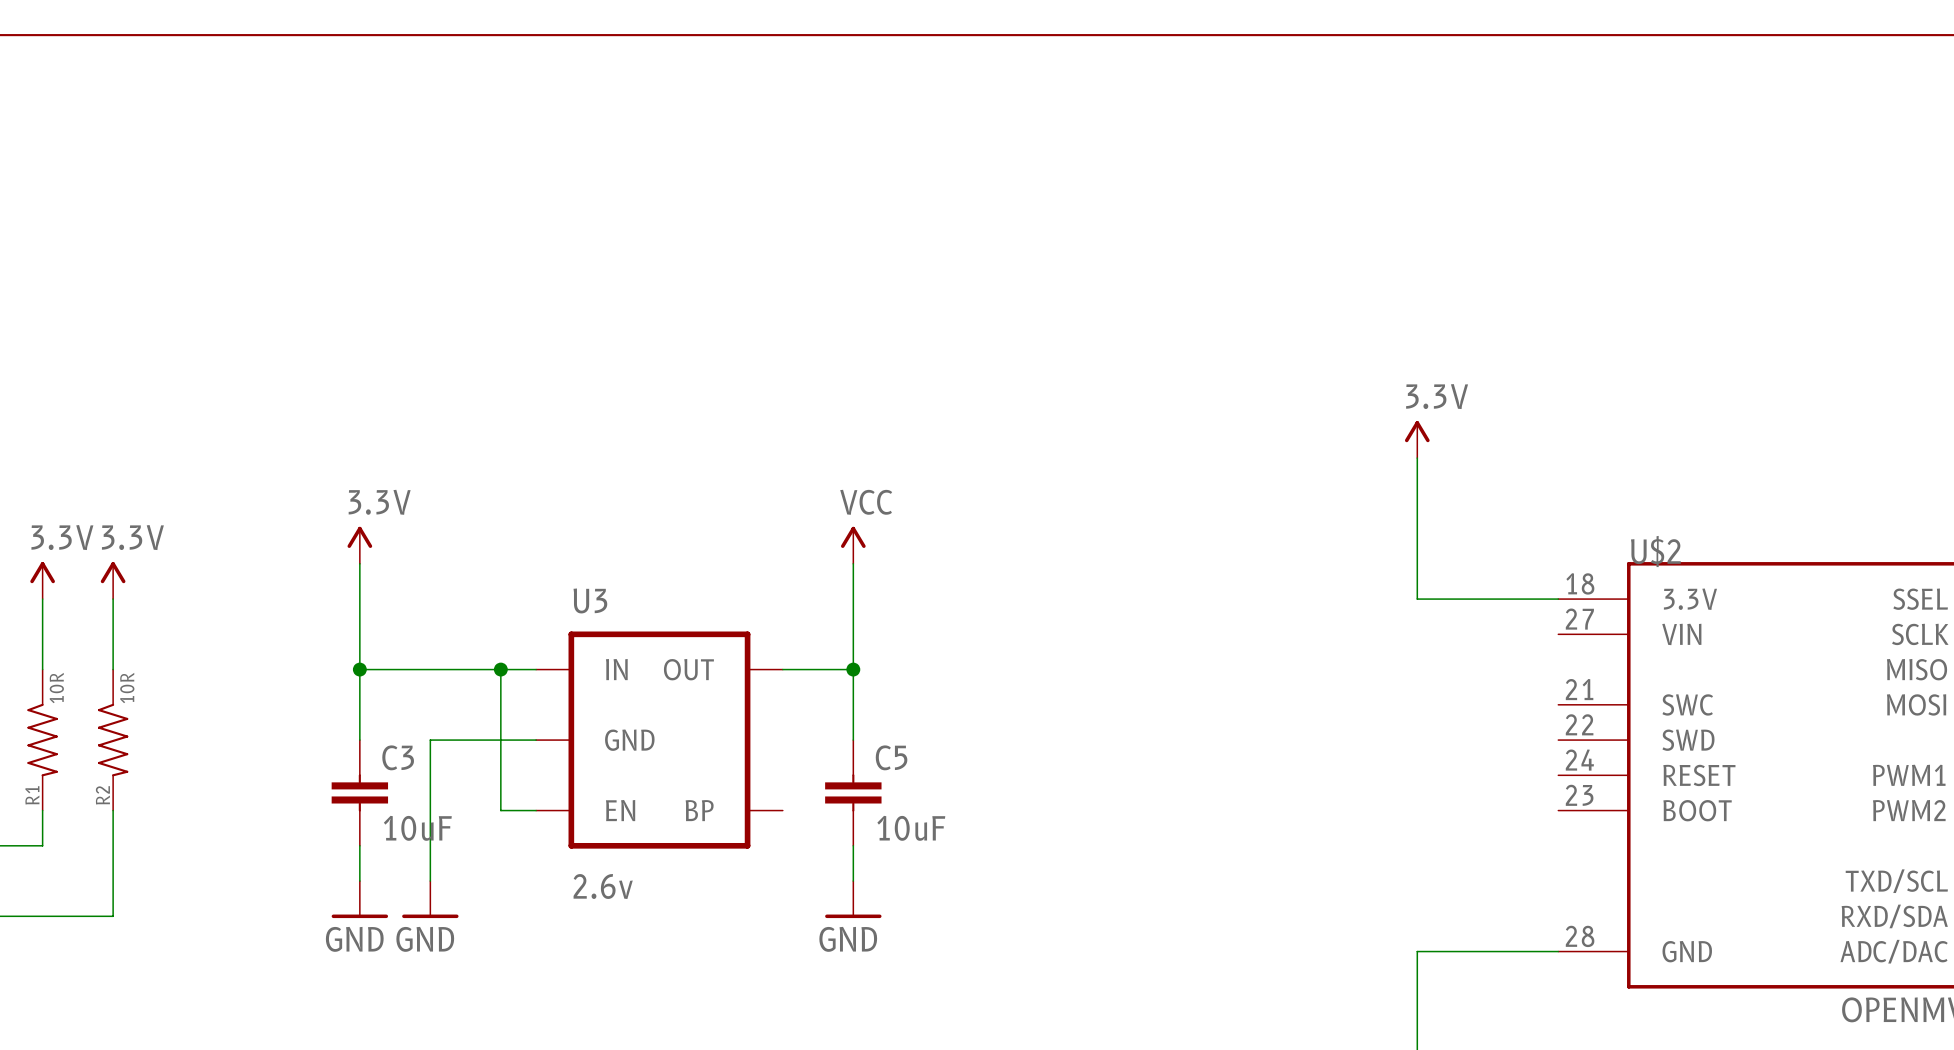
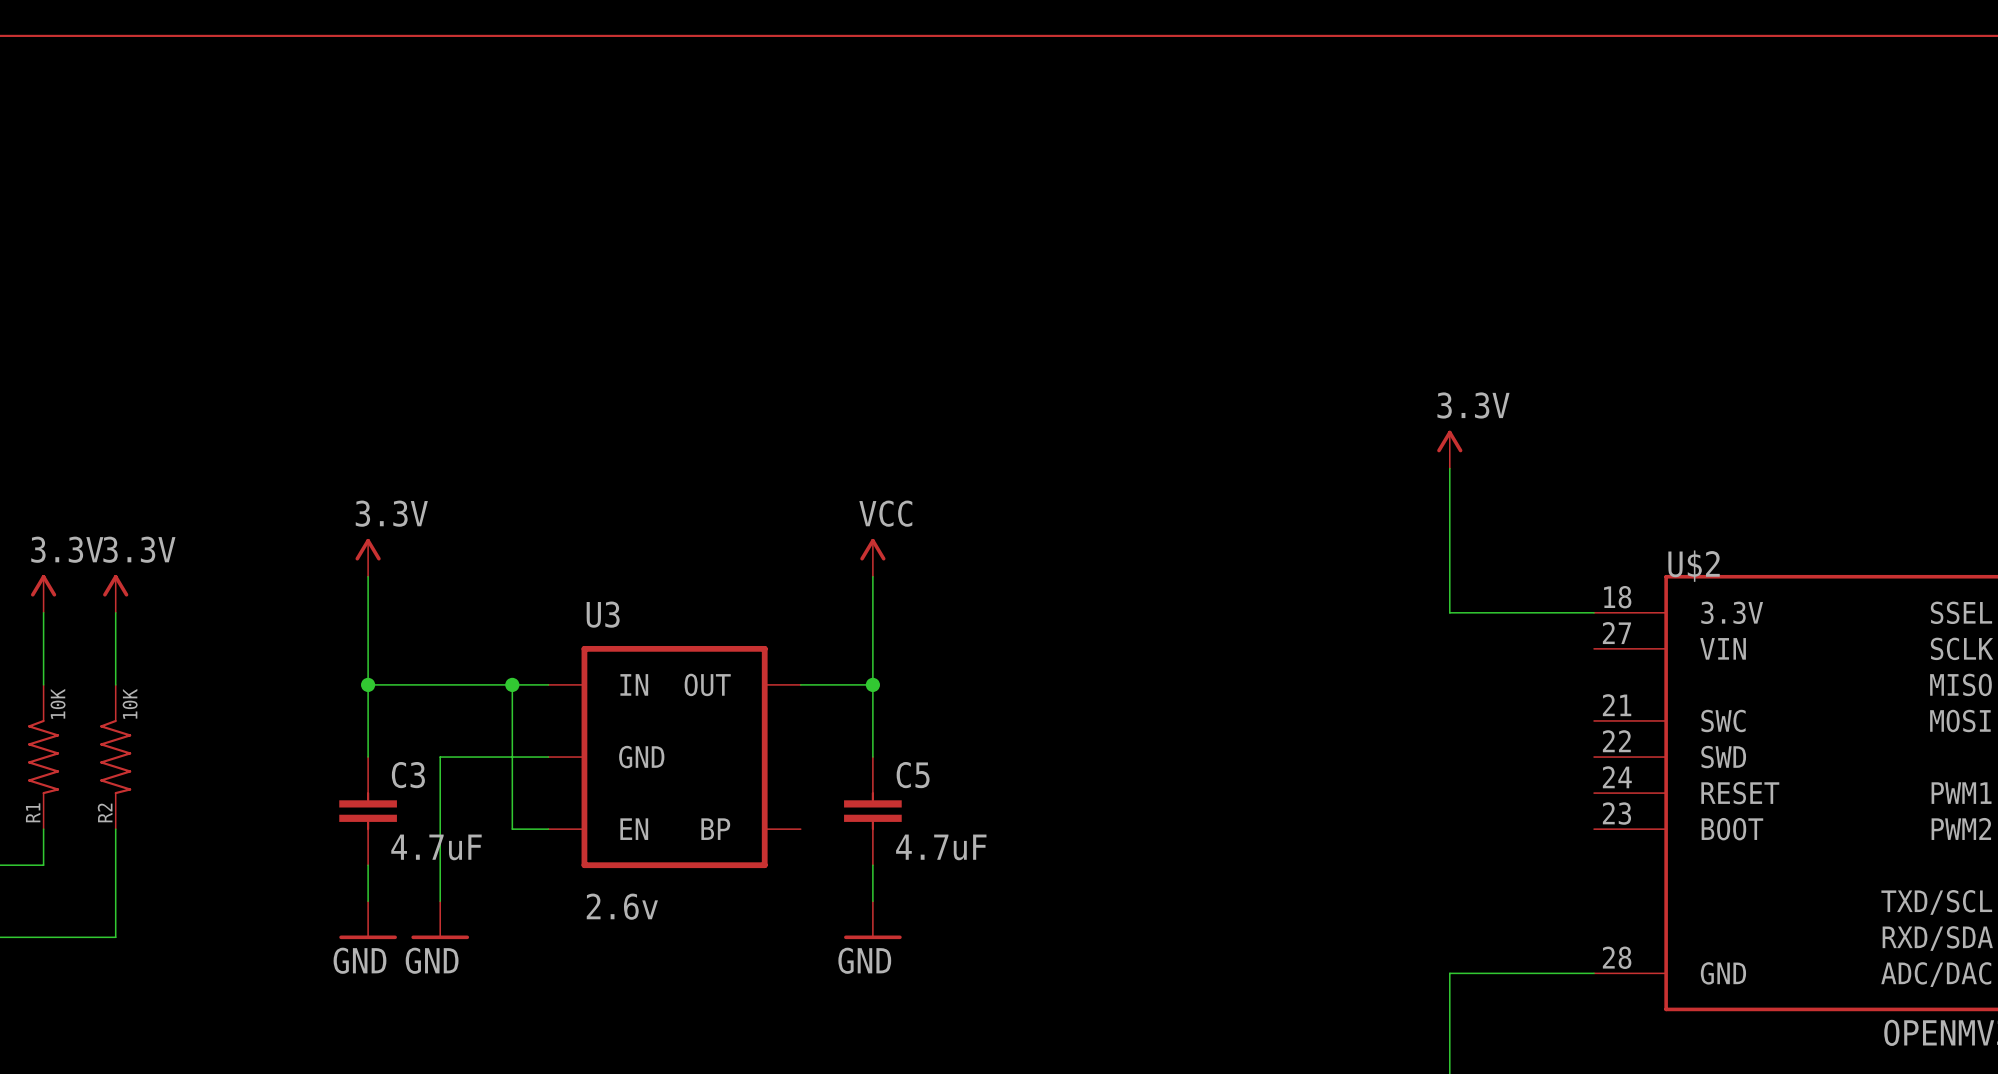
R1 value: 10R (56, 687) -> 10K (58, 703)
R2 value: 10R (127, 687) -> 10K (130, 703)
C3 value: 10uF (417, 828) -> 4.7uF (436, 847)
C5 value: 10uF (911, 828) -> 4.7uF (941, 847)

